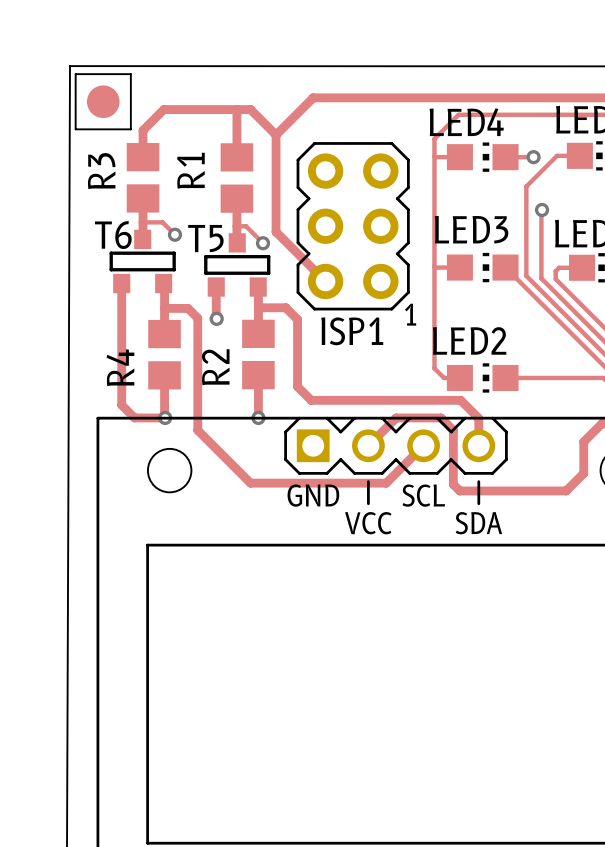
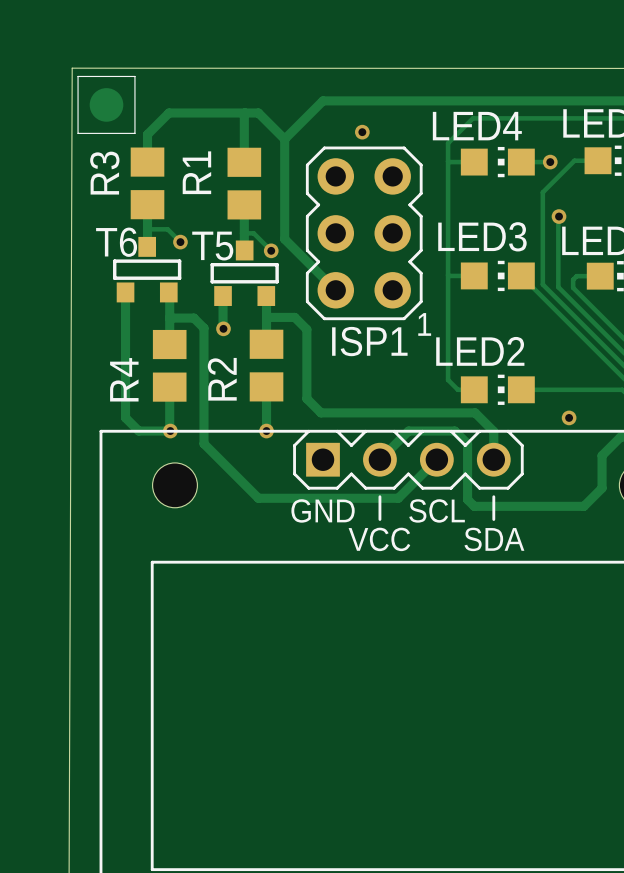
via: none -> (362, 132)
via: none -> (569, 417)

